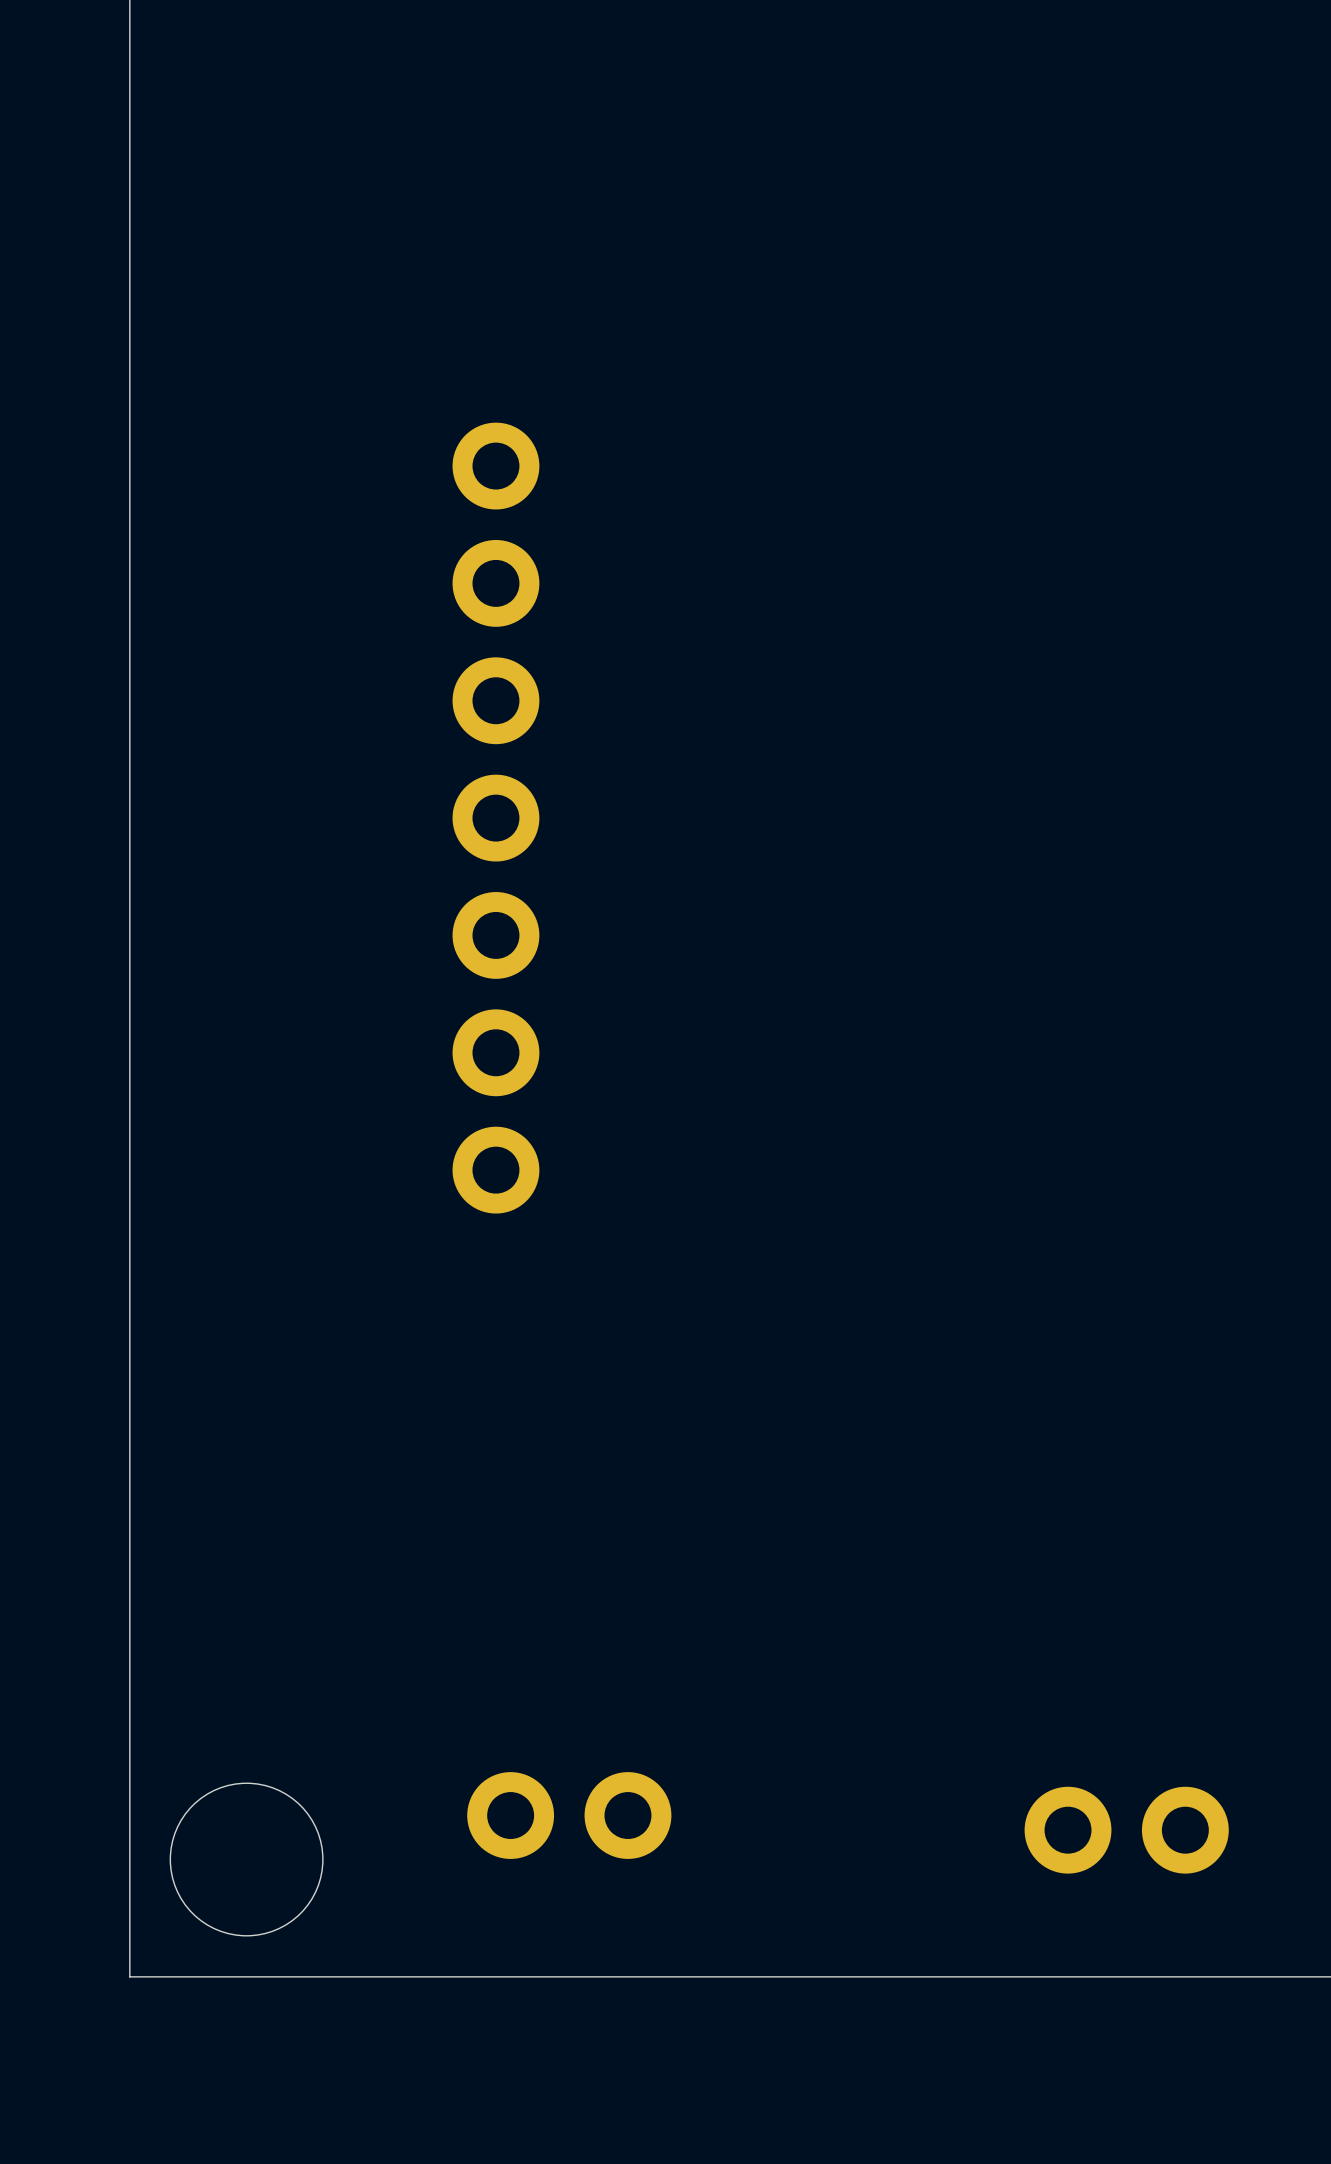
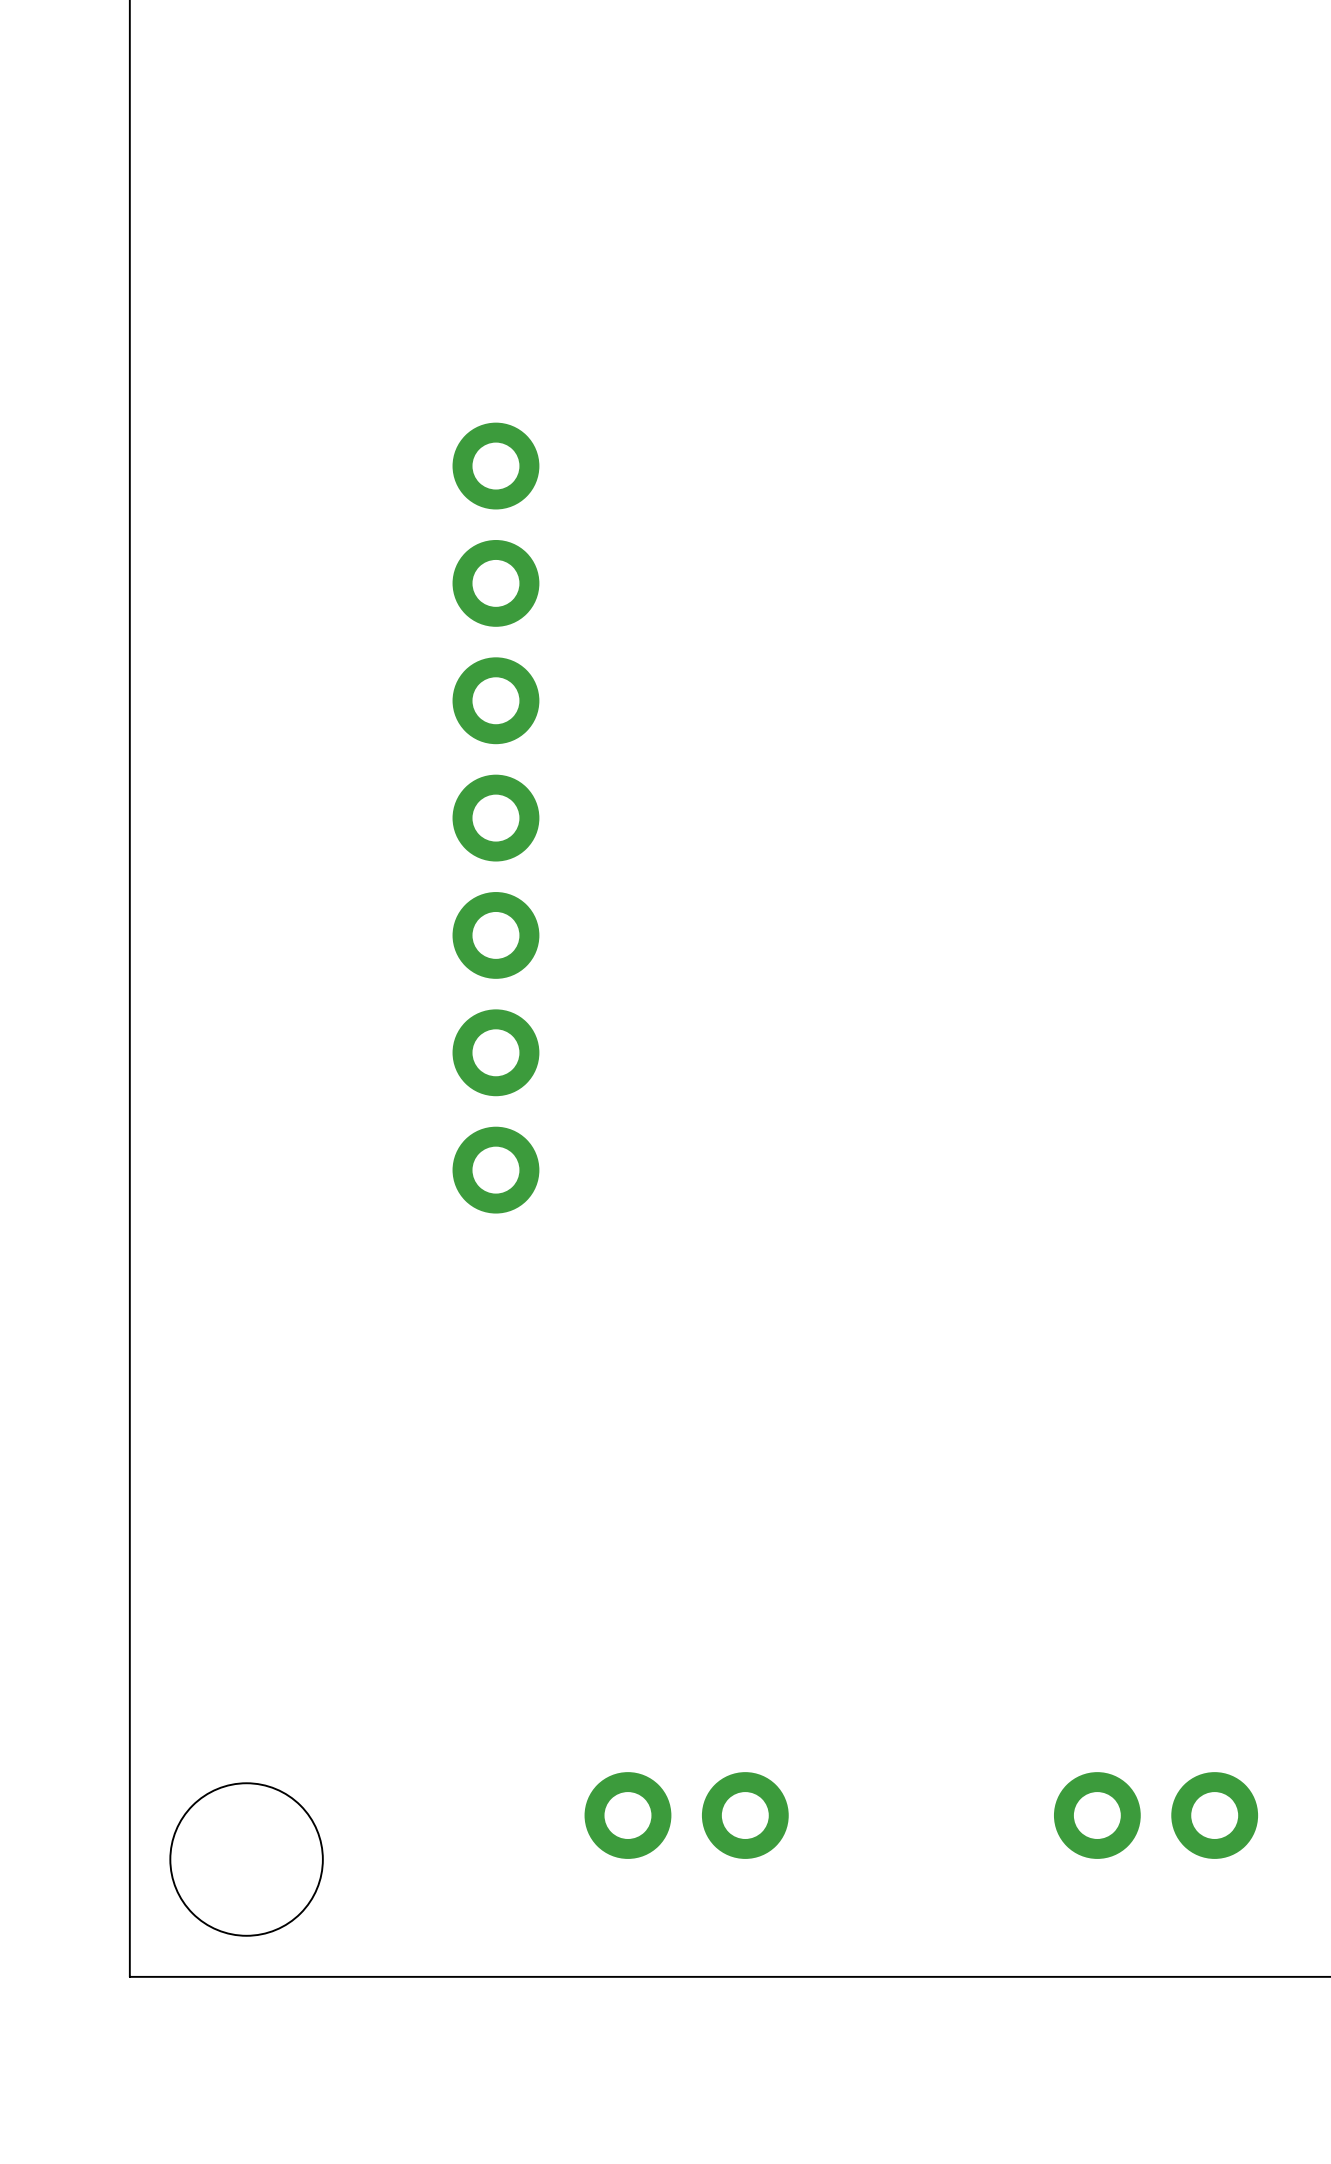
part position: (569, 1815) -> (686, 1815)
part position: (1126, 1830) -> (1156, 1815)

